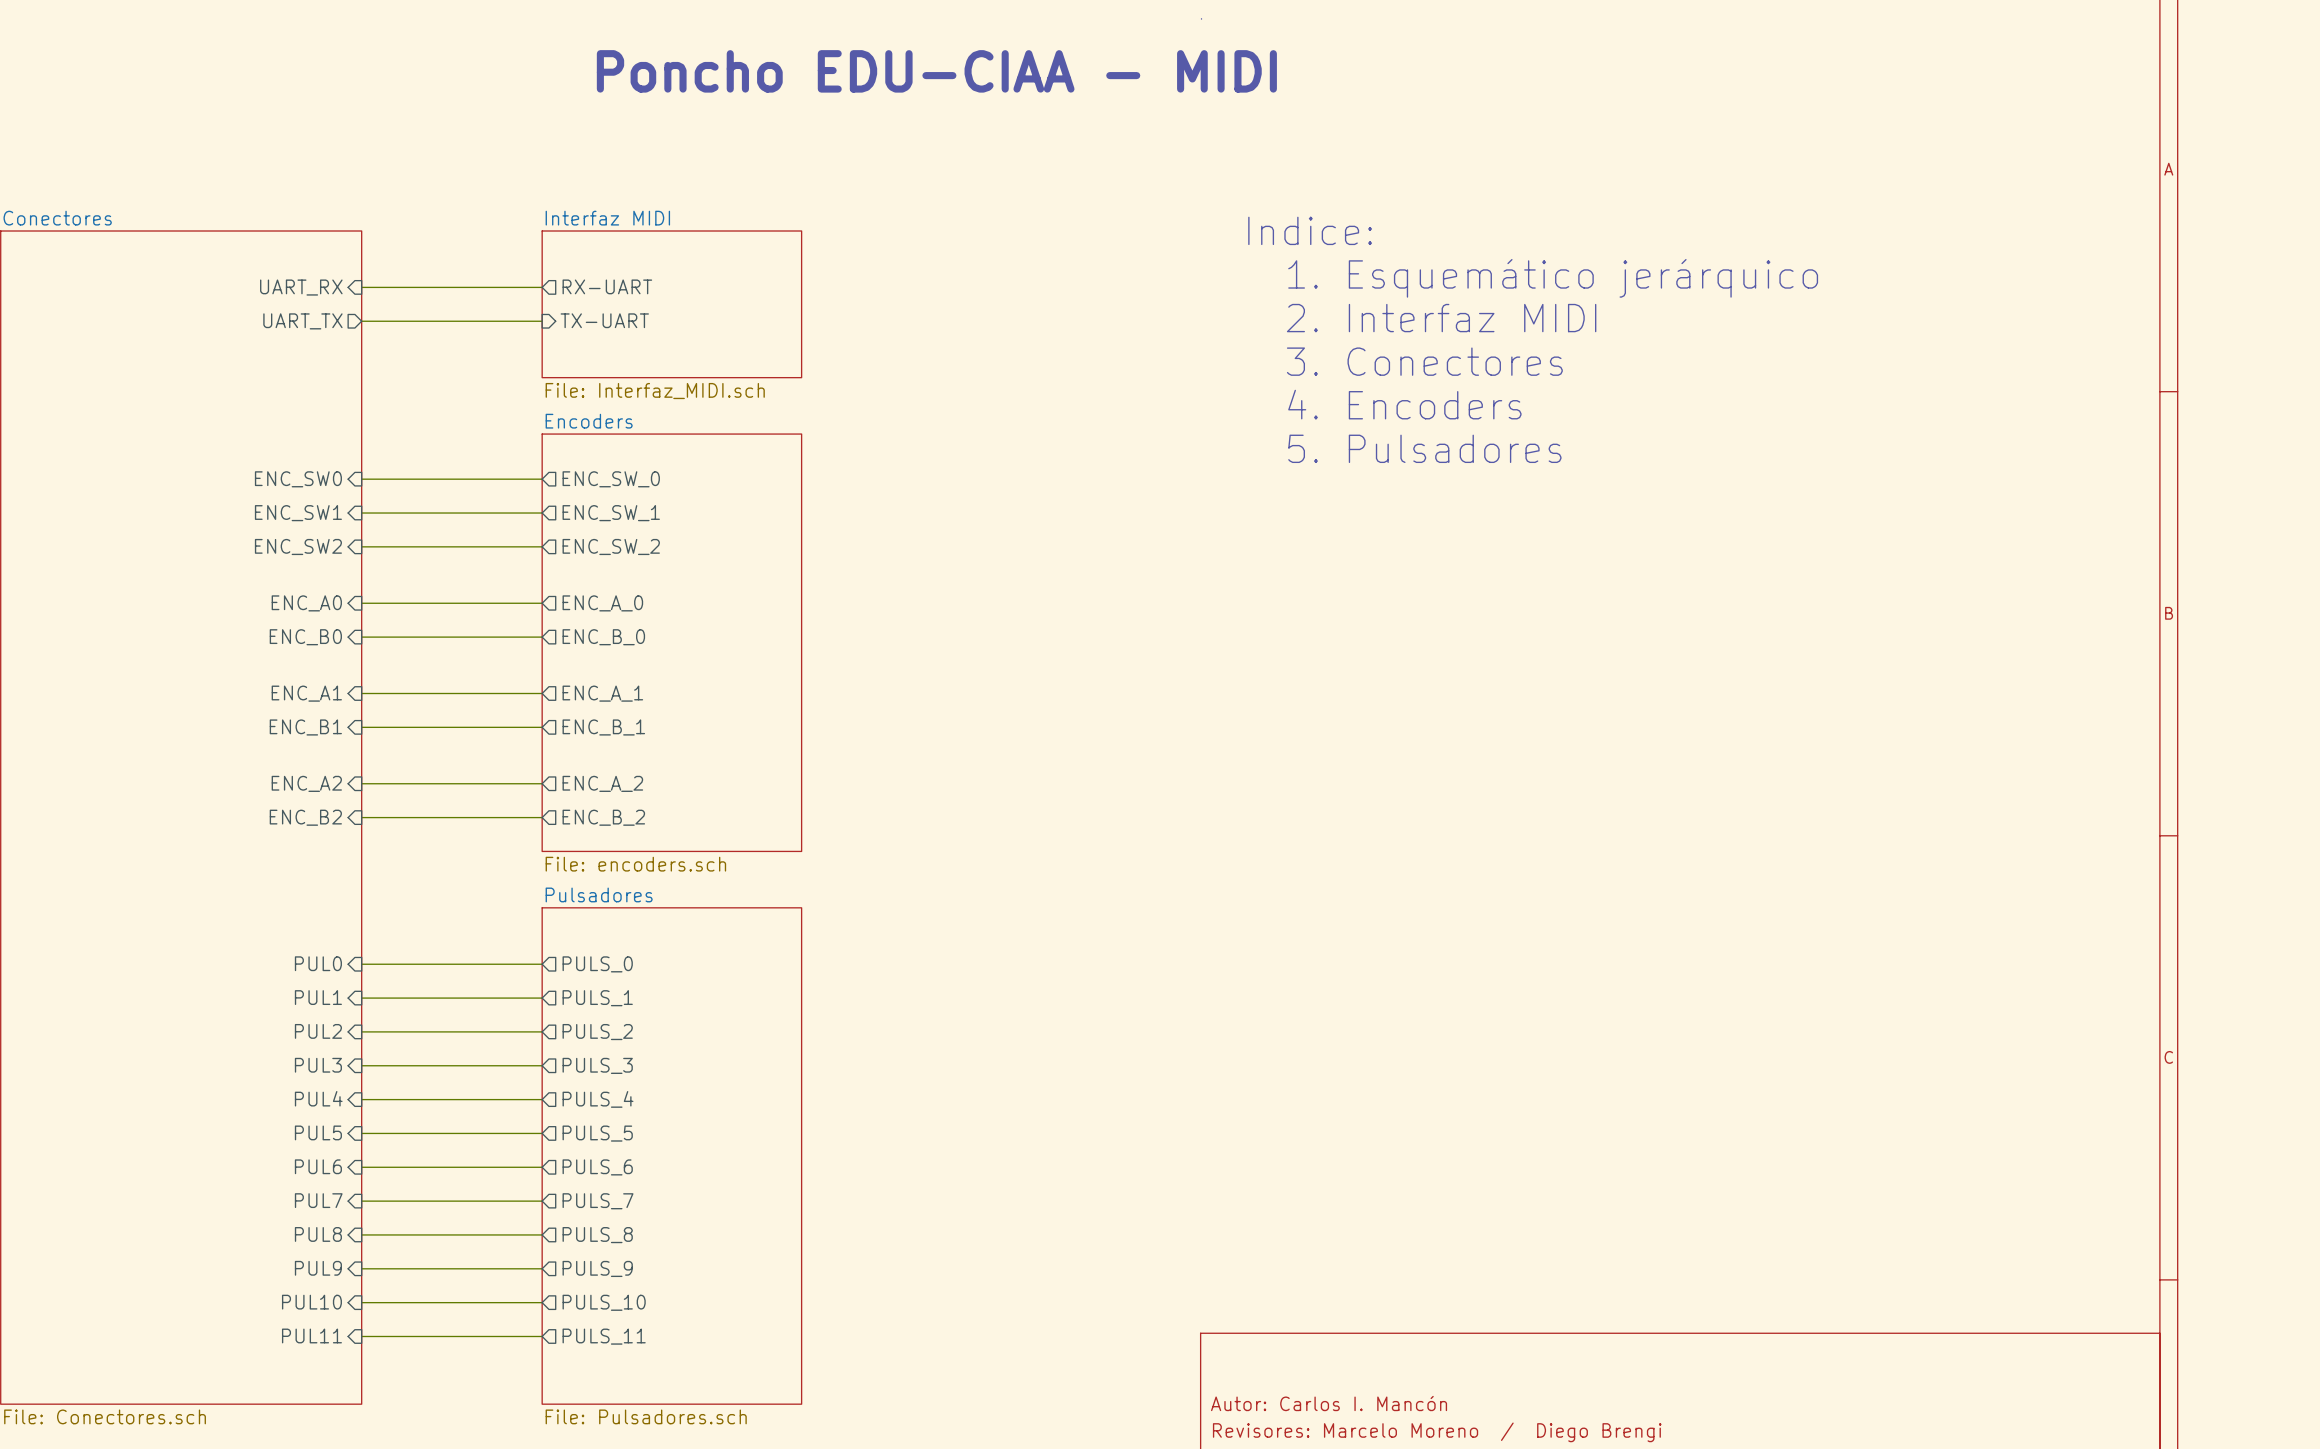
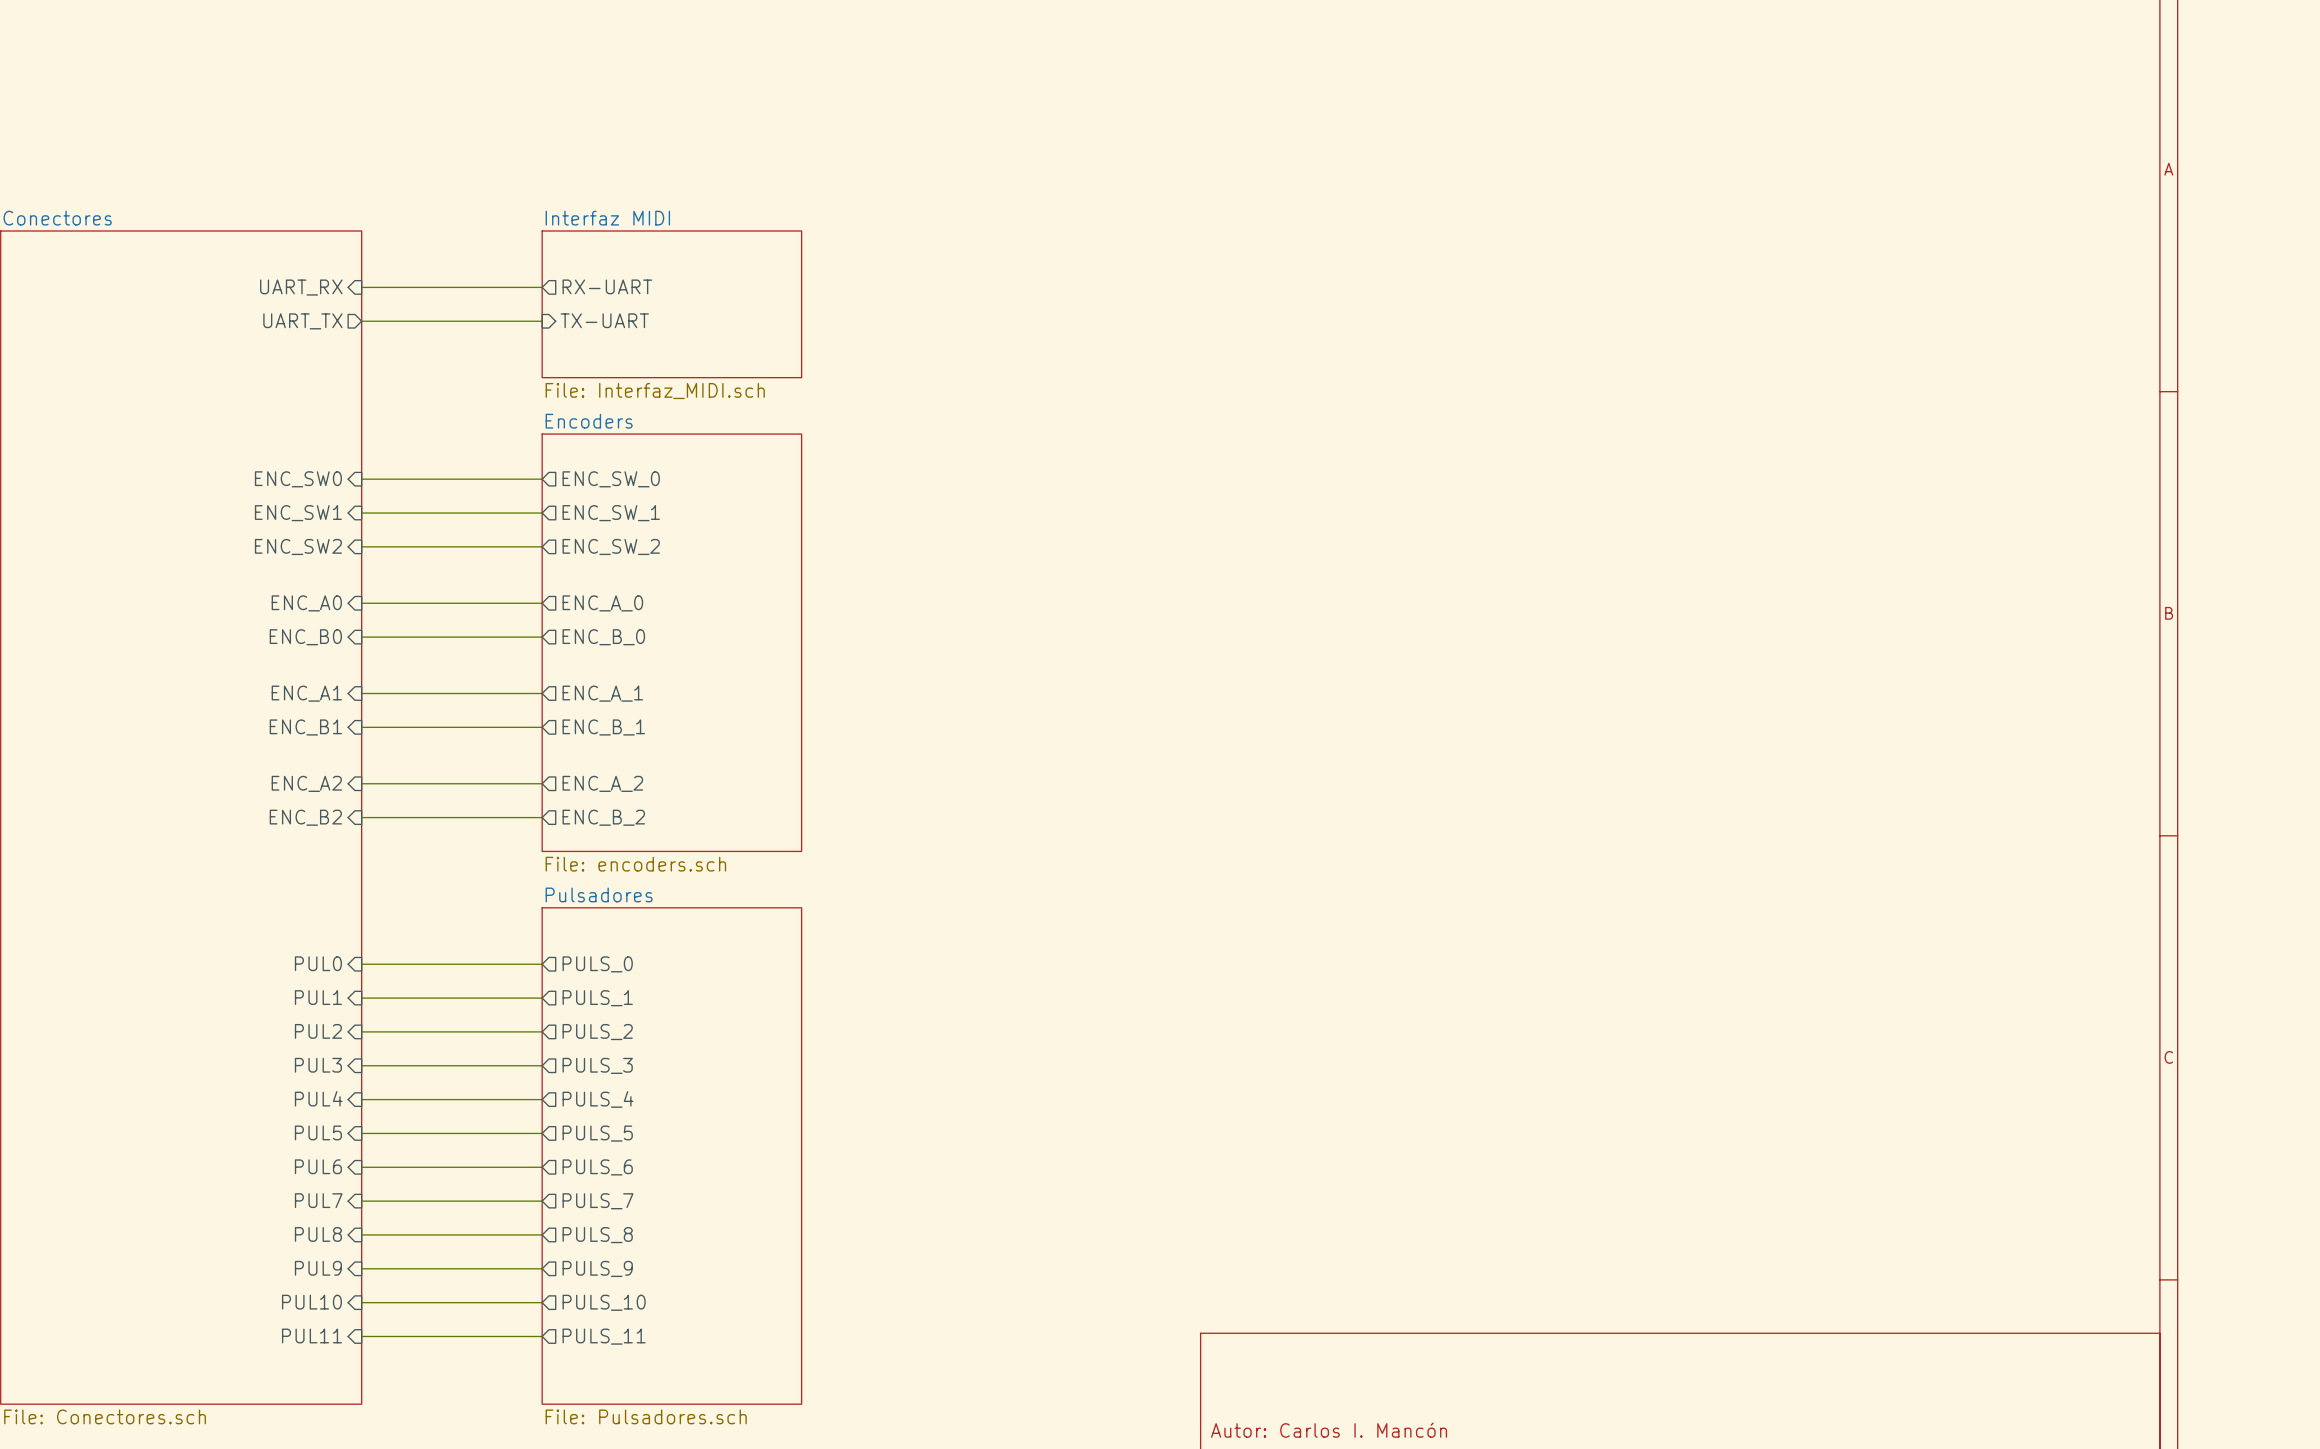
text: Poncho EDU-CIAA - MIDI (936, 71) -> none
text: Indice: (1310, 230) -> none
text: 1. Esquemático jerárquico (1553, 278) -> none
text: 2. Interfaz MIDI (1441, 318) -> none
text: 3. Conectores (1424, 361) -> none
text: 4. Encoders (1404, 404) -> none
text: 5. Pulsadores (1424, 448) -> none
title block: Autor: Carlos I. Mancón (1329, 1403) -> none
title block: Revisores: Marcelo Moreno / Diego Brengi (1437, 1432) -> Autor: Carlos I. Mancón (1329, 1430)

